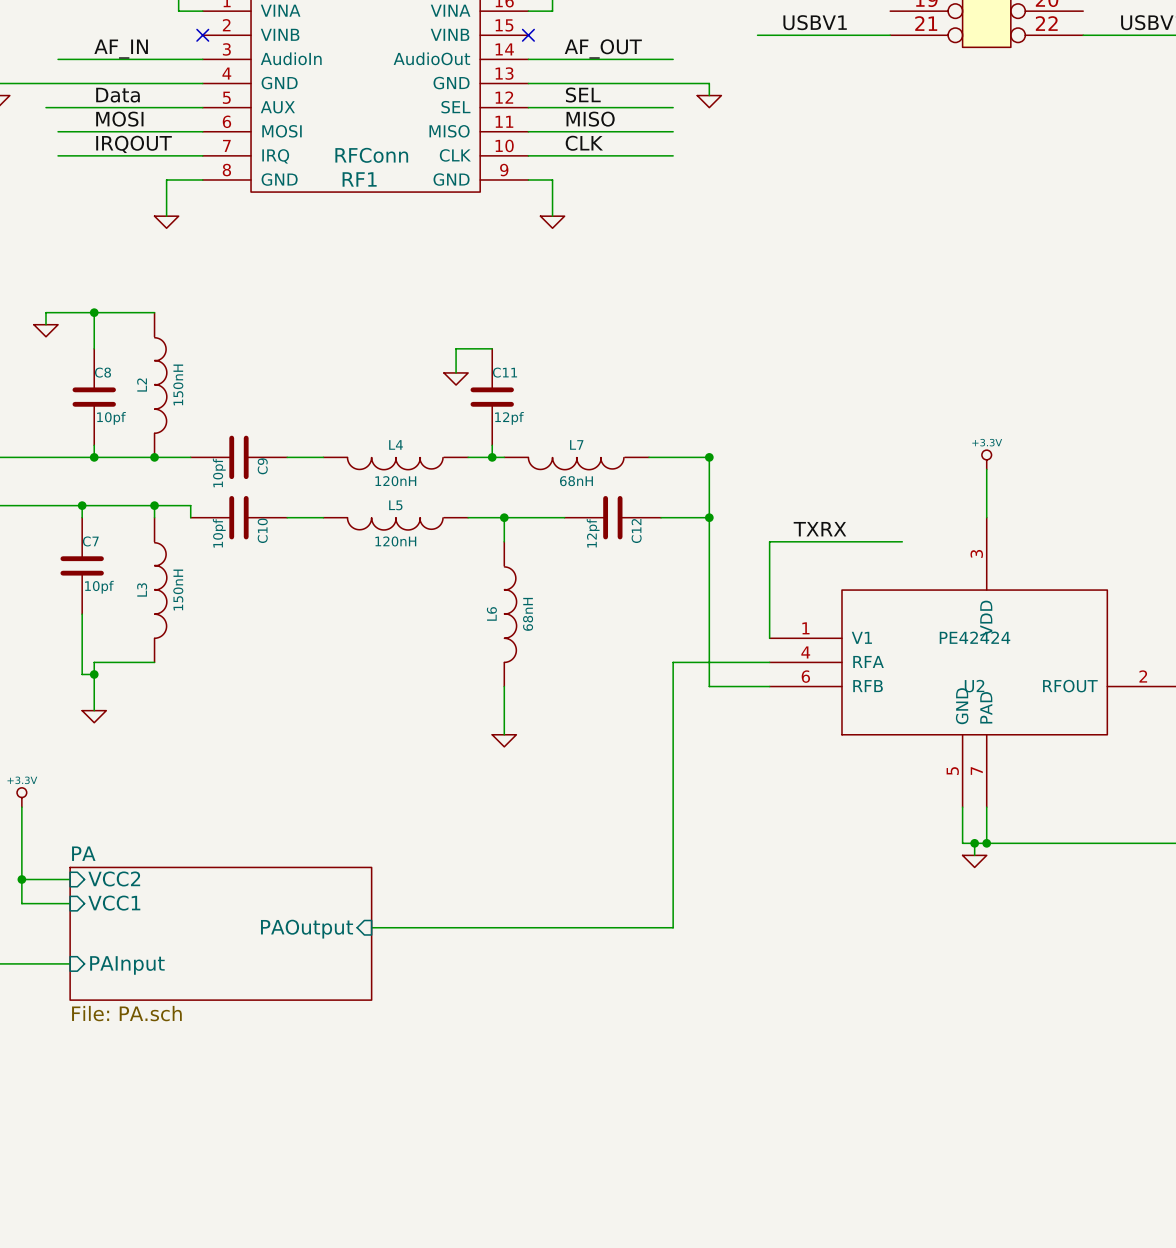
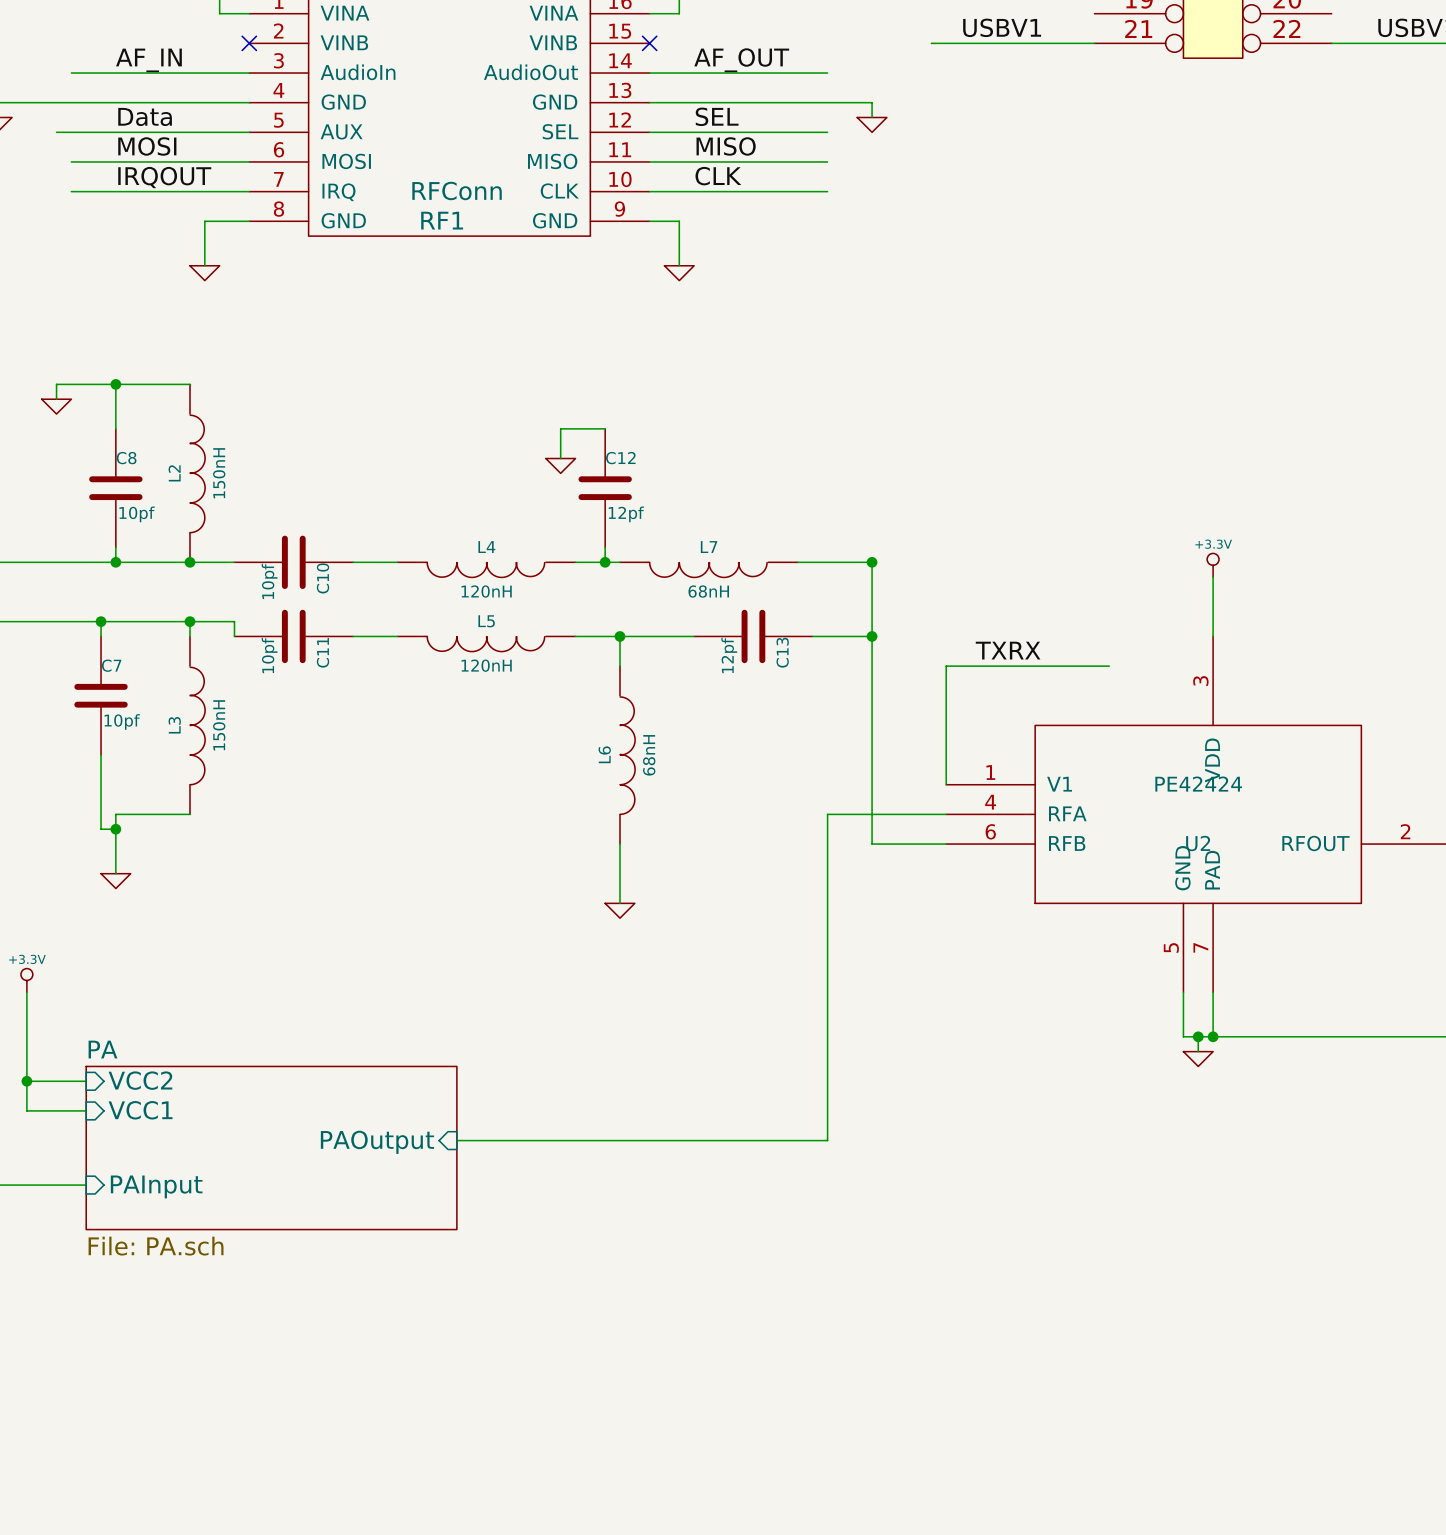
C11 name: C11 (505, 372) -> C12 (620, 458)
C9 name: C9 (262, 466) -> C10 (323, 578)
C10 name: C10 (262, 530) -> C11 (323, 652)
C12 name: C12 (636, 531) -> C13 (782, 652)

